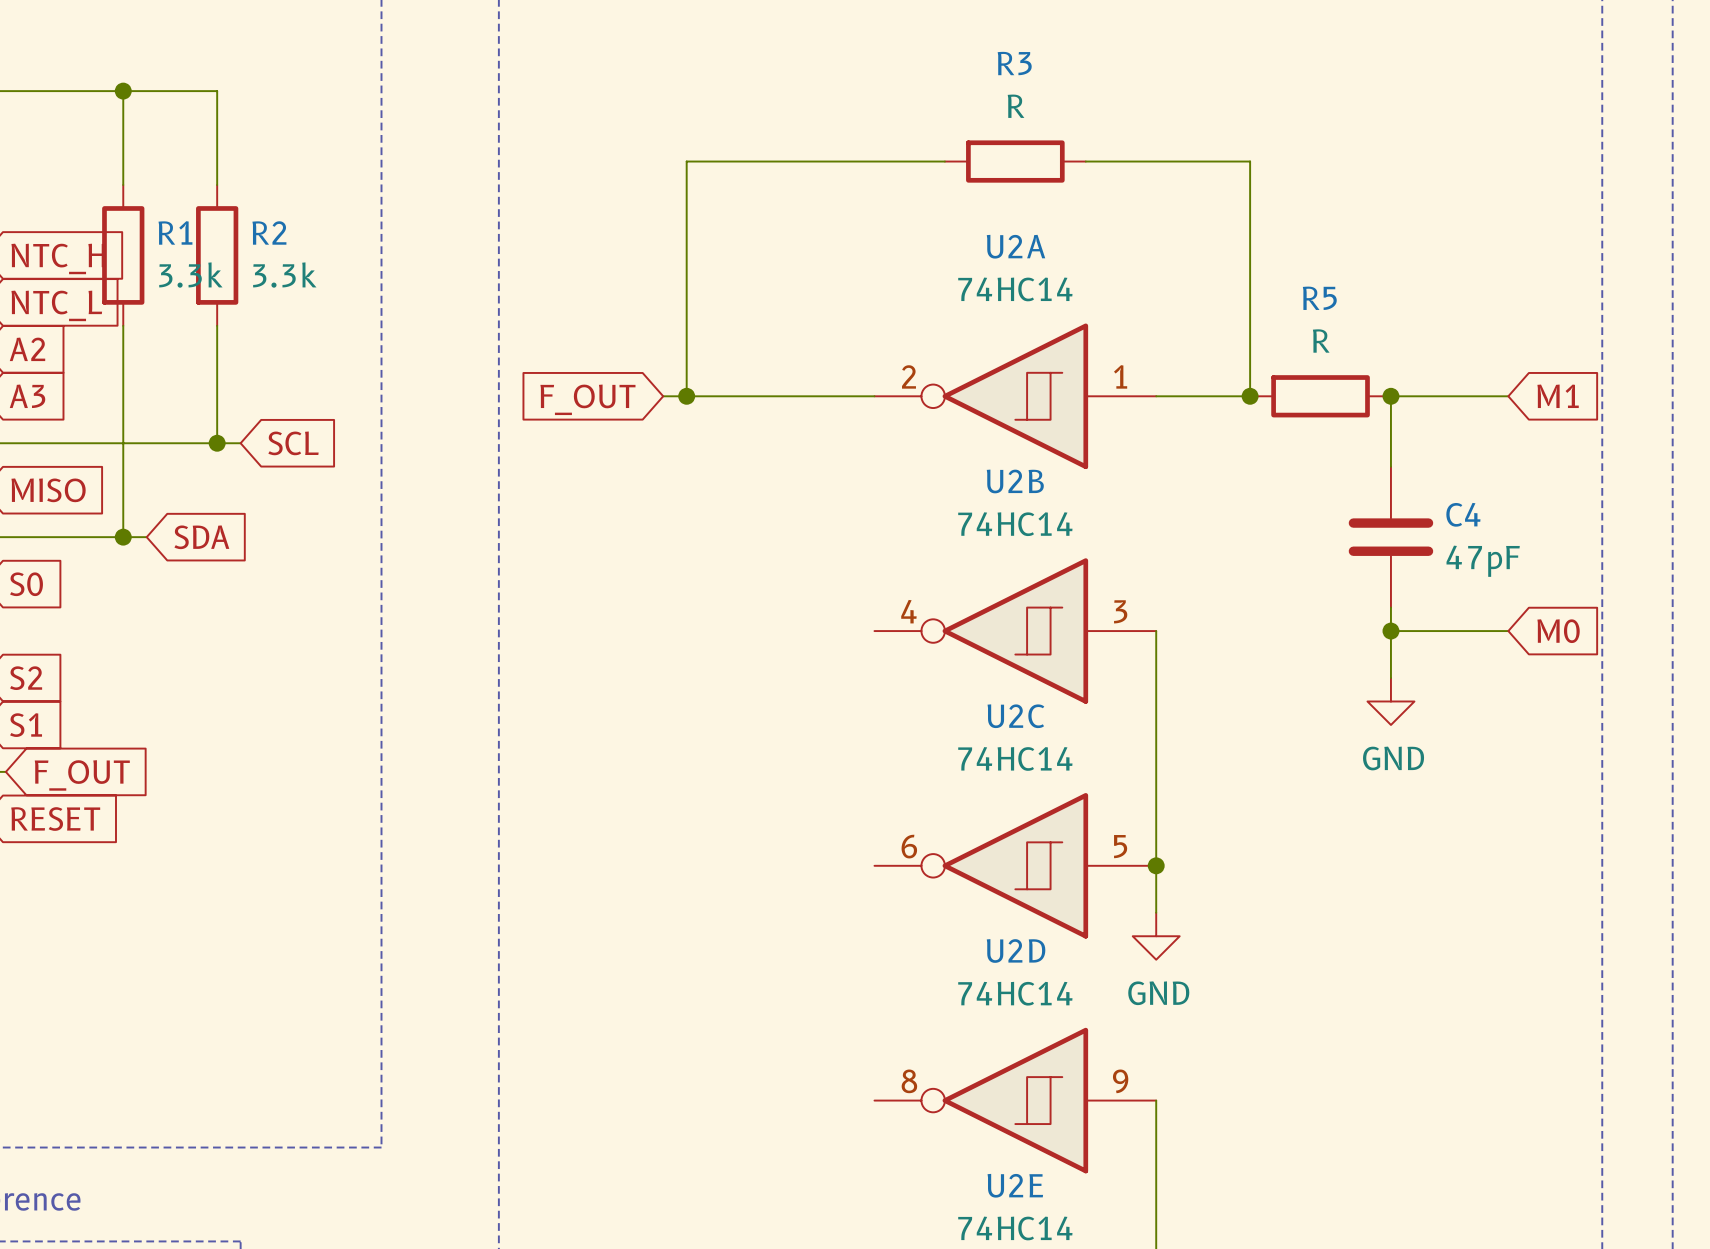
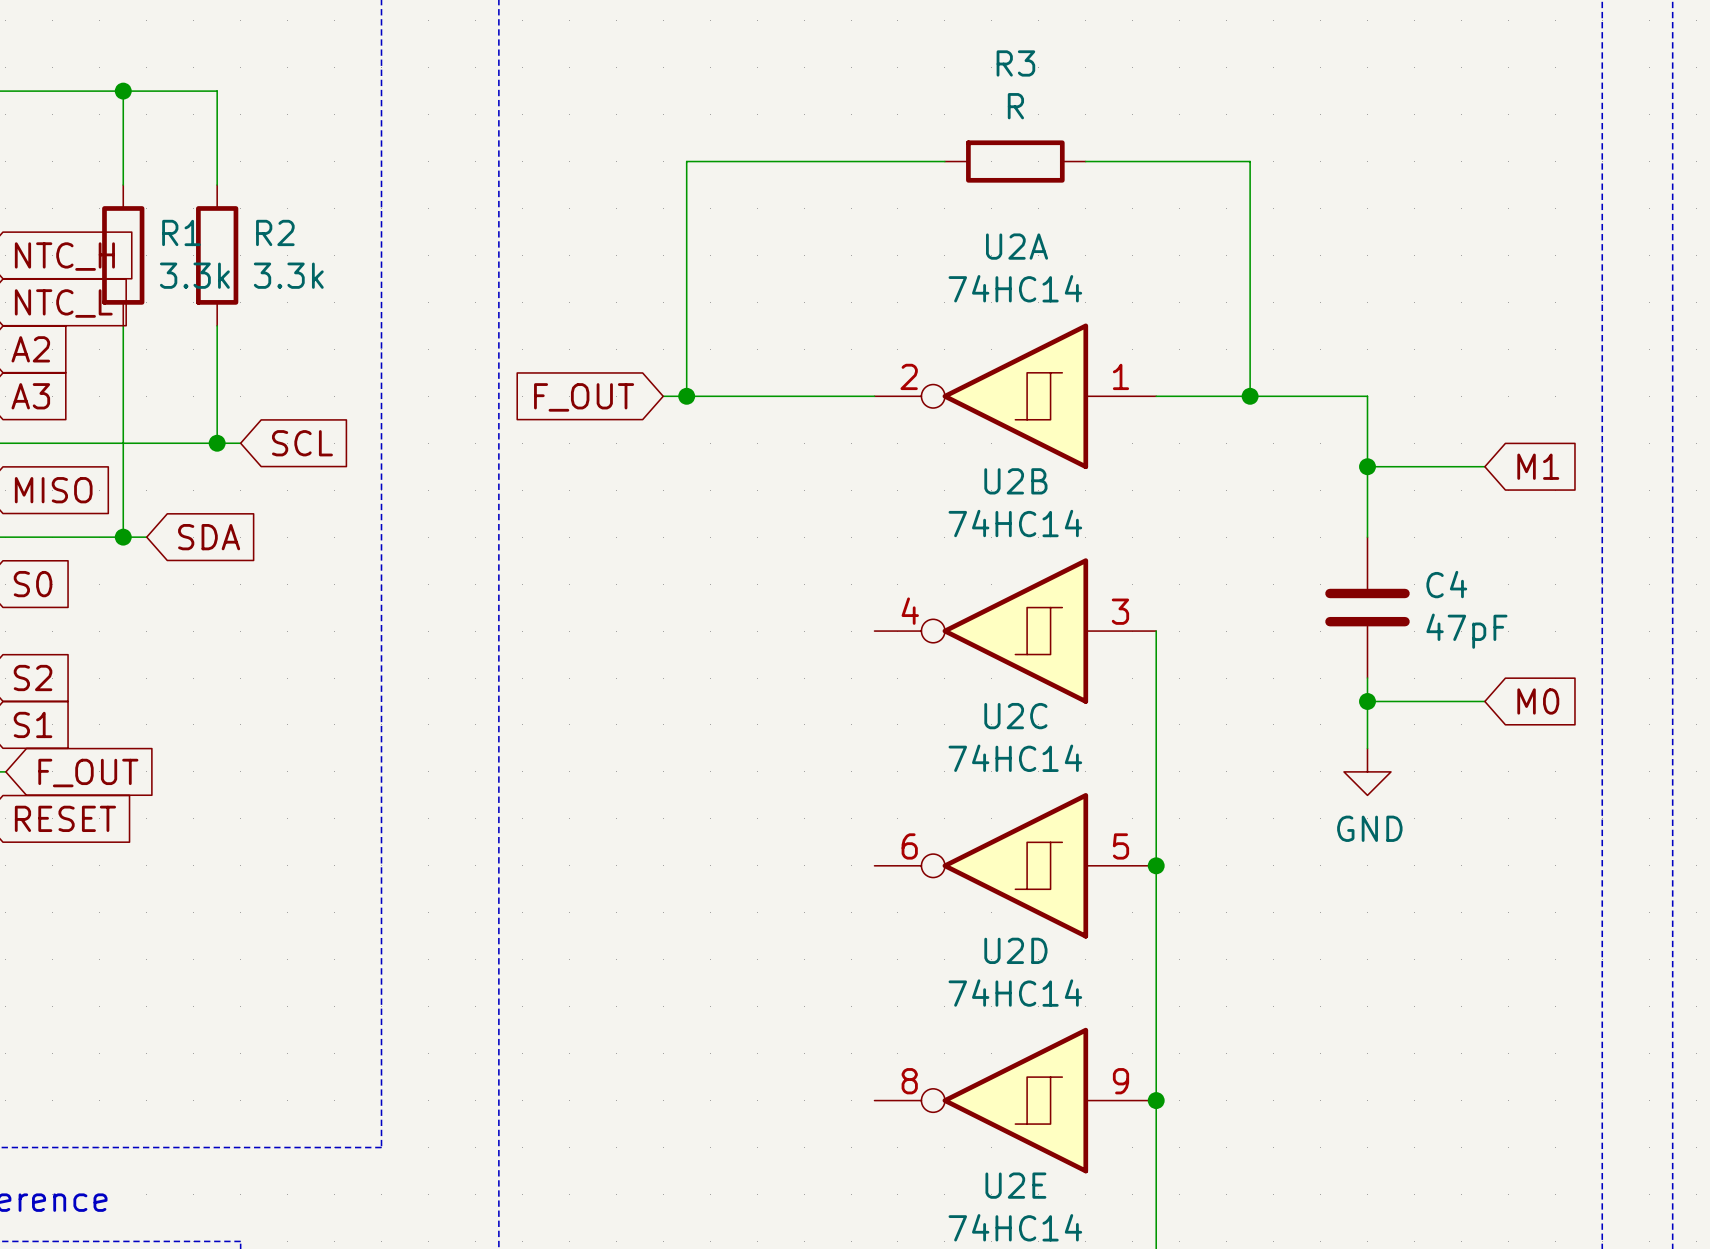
wire: none -> (1250, 396) (1367, 396) (1367, 537)
R5: R (1320, 396) -> none
junction position: (1390, 396) -> (1367, 466)
wire: (1508, 396) (1390, 396) (1390, 466) -> none
global label position: M1 (1558, 396) -> M1 (1538, 466)
wire: none -> (1367, 466) (1484, 466)
C4 position: (1390, 537) -> (1367, 607)
wire: (1390, 607) (1390, 678) -> (1367, 678) (1367, 748)
wire: (1390, 631) (1508, 631) -> (1367, 701) (1484, 701)
junction position: (1390, 631) -> (1367, 701)
global label position: M0 (1558, 631) -> M0 (1538, 701)
power symbol position: GND (1390, 701) -> GND (1367, 771)
wire: none -> (1156, 912) (1156, 1100)
power symbol: GND (1156, 936) -> none
junction: none -> (1156, 1100)

